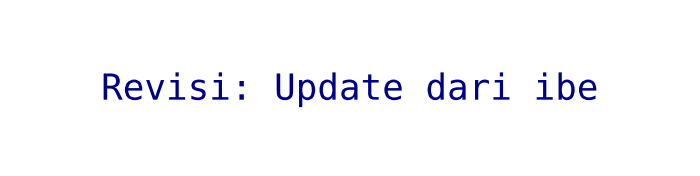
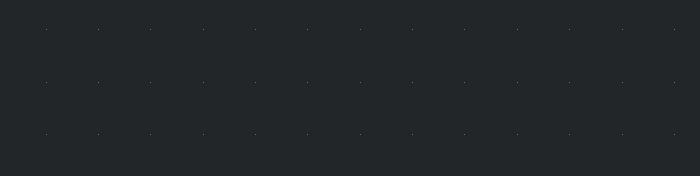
text: Revisi: Update dari ibe (349, 89) -> none

